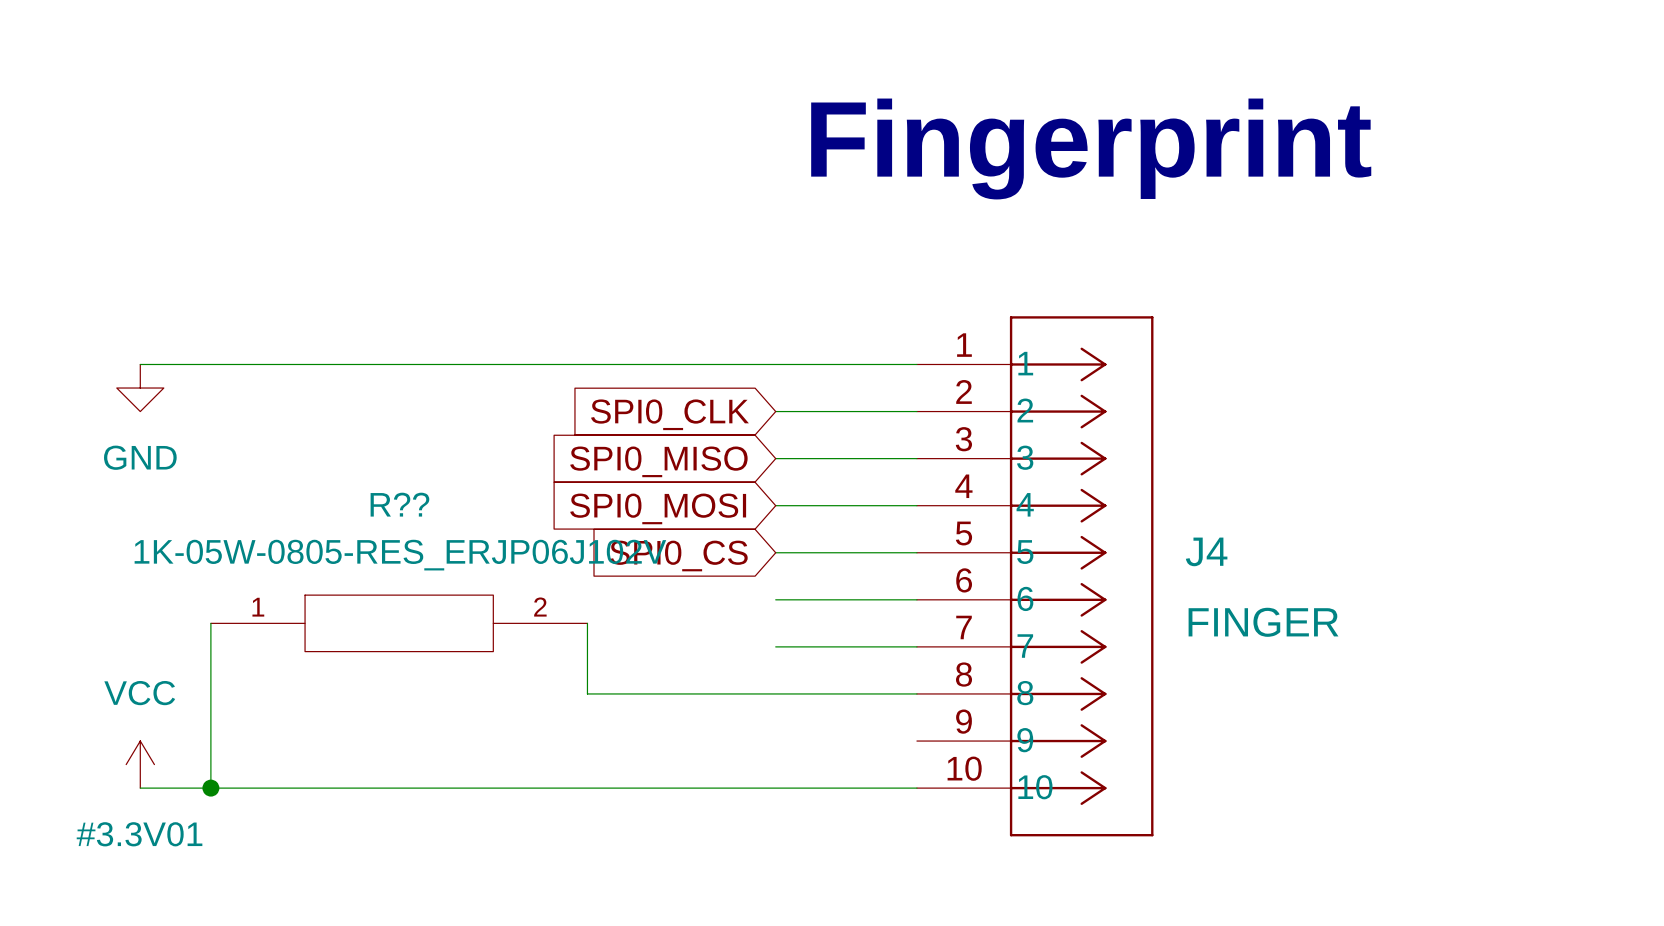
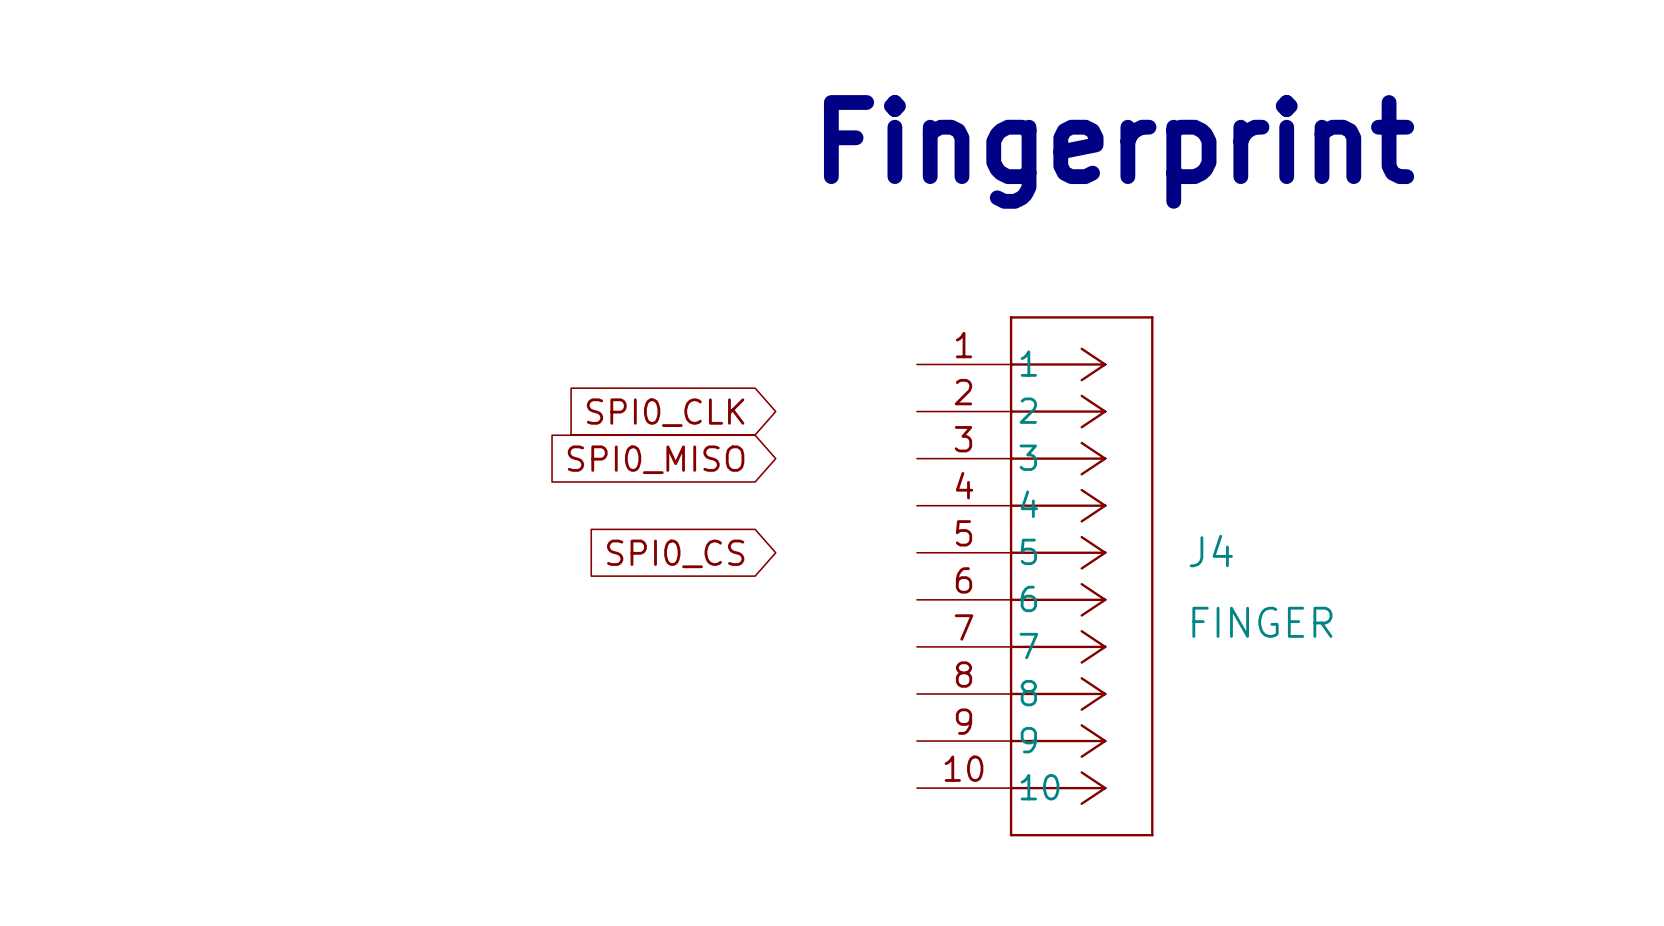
wire: (140, 364) (916, 364) -> none
power symbol: GND (140, 388) -> none
wire: (775, 411) (916, 411) -> none
wire: (775, 458) (916, 458) -> none
wire: (775, 505) (916, 505) -> none
global label: SPI0_MOSI (658, 508) -> none
wire: (775, 552) (916, 552) -> none
wire: (775, 599) (916, 599) -> none
wire: (210, 623) (210, 788) -> none
R??: 1K-05W-0805-RES_ERJP06J102V (399, 623) -> none
wire: (587, 623) (587, 693) (916, 693) -> none
wire: (775, 646) (916, 646) -> none
#3.3V01: VCC (140, 764) -> none
wire: (140, 788) (916, 788) -> none
junction: (210, 788) -> none

